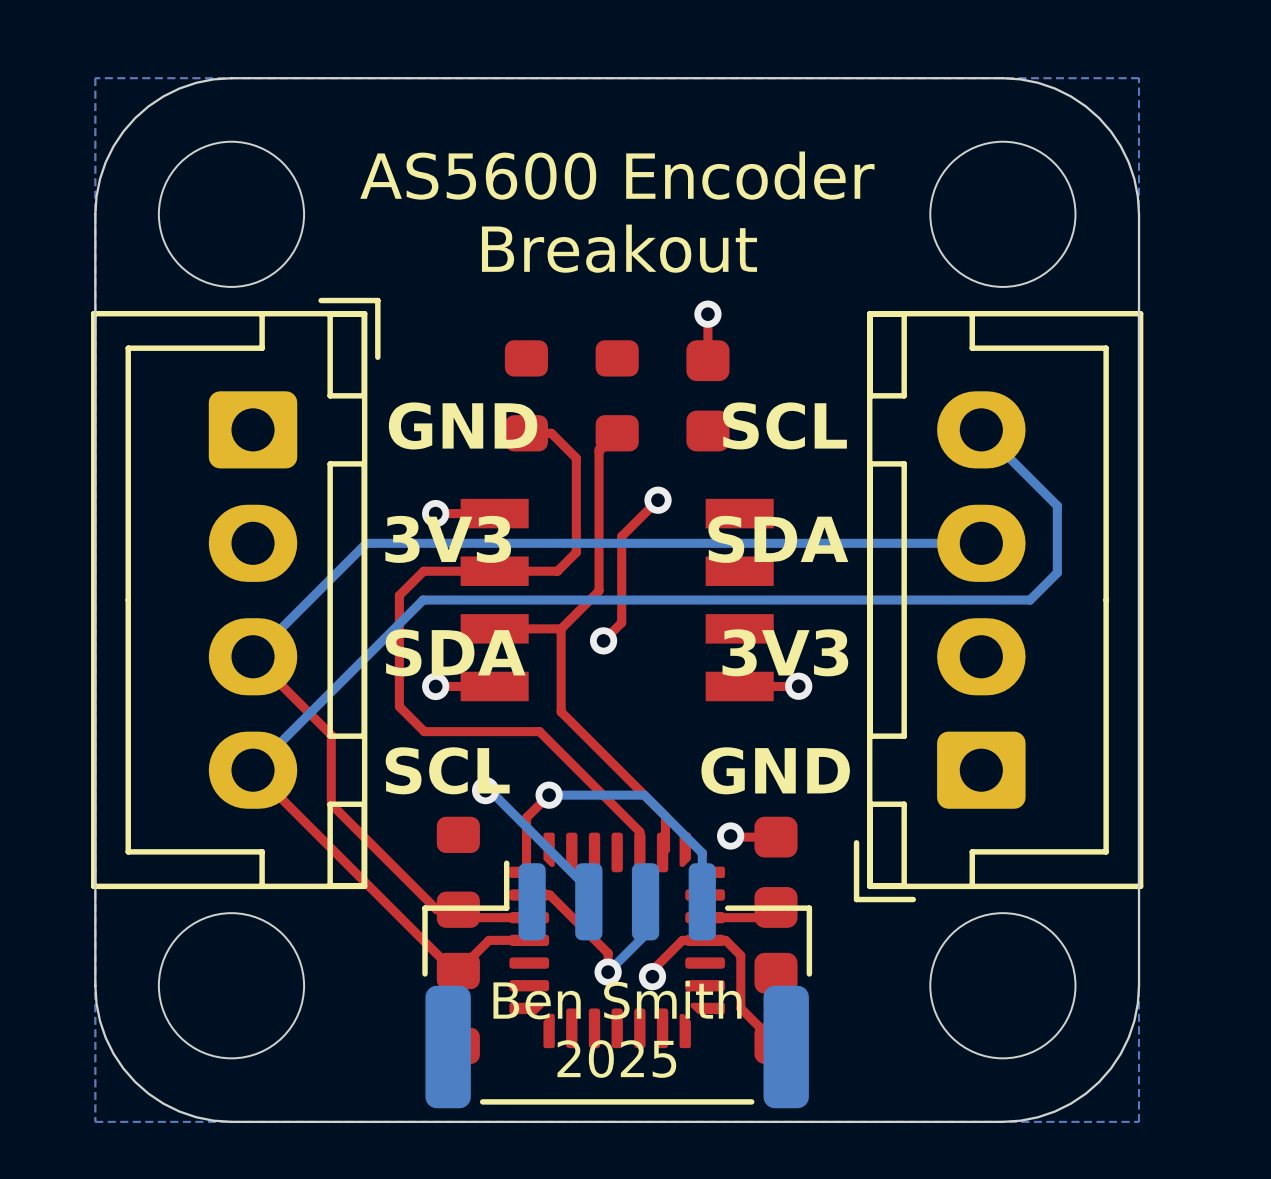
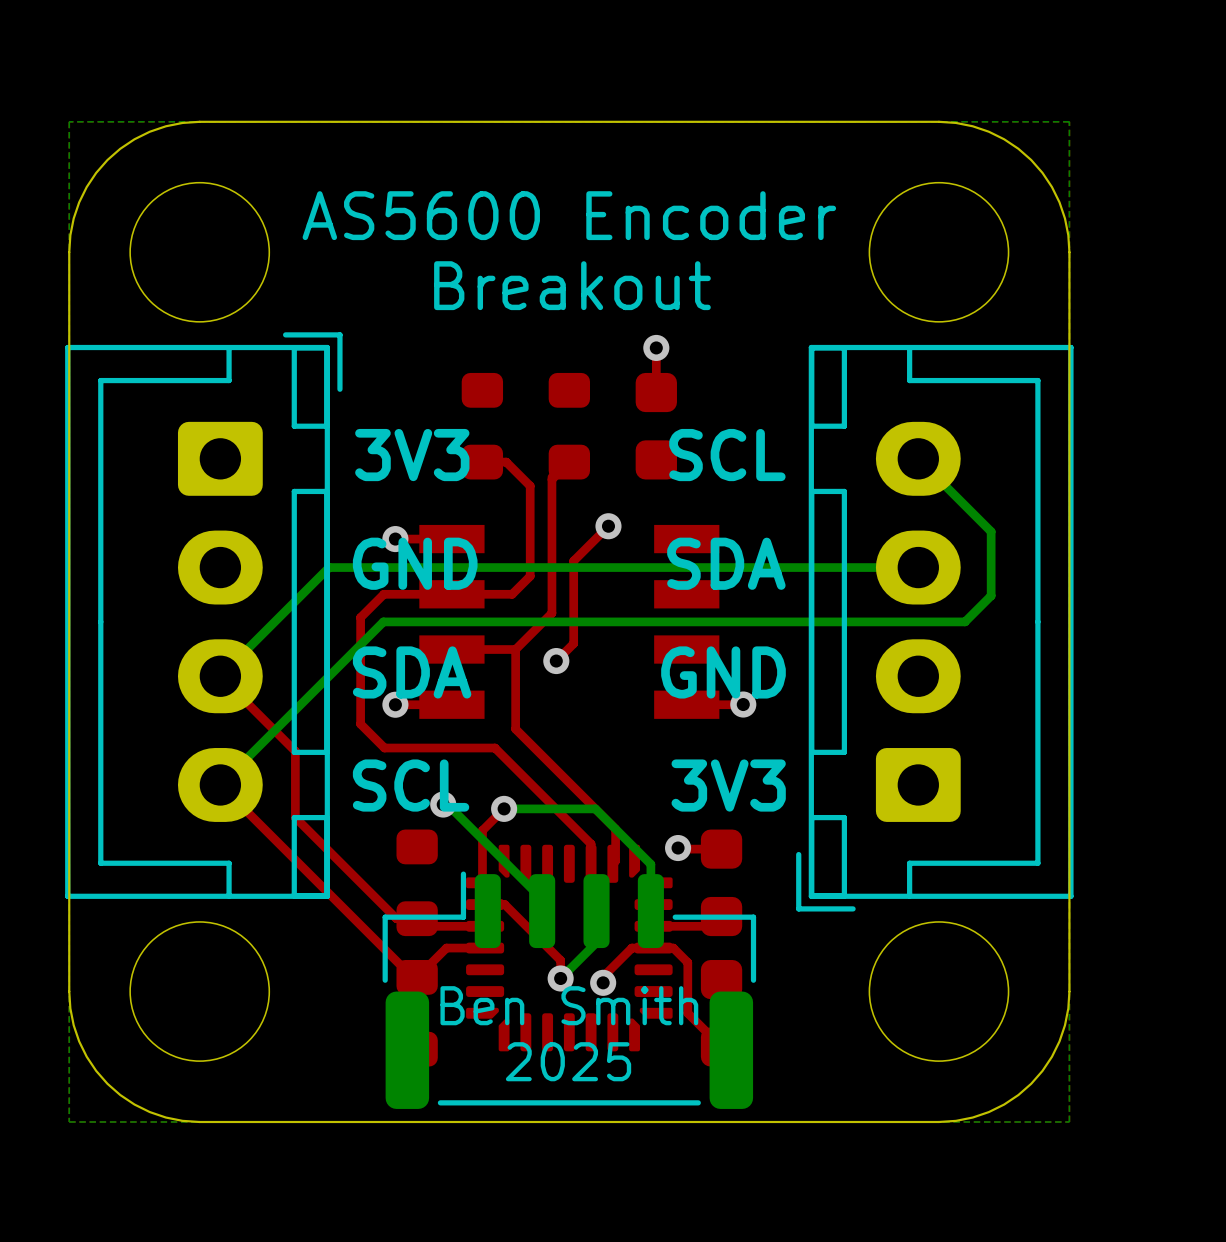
text: GND (463, 425) -> 3V3 (412, 455)
text: 3V3 (448, 539) -> GND (415, 563)
text: 3V3 (785, 652) -> GND (723, 672)
text: GND (775, 770) -> 3V3 (728, 785)

